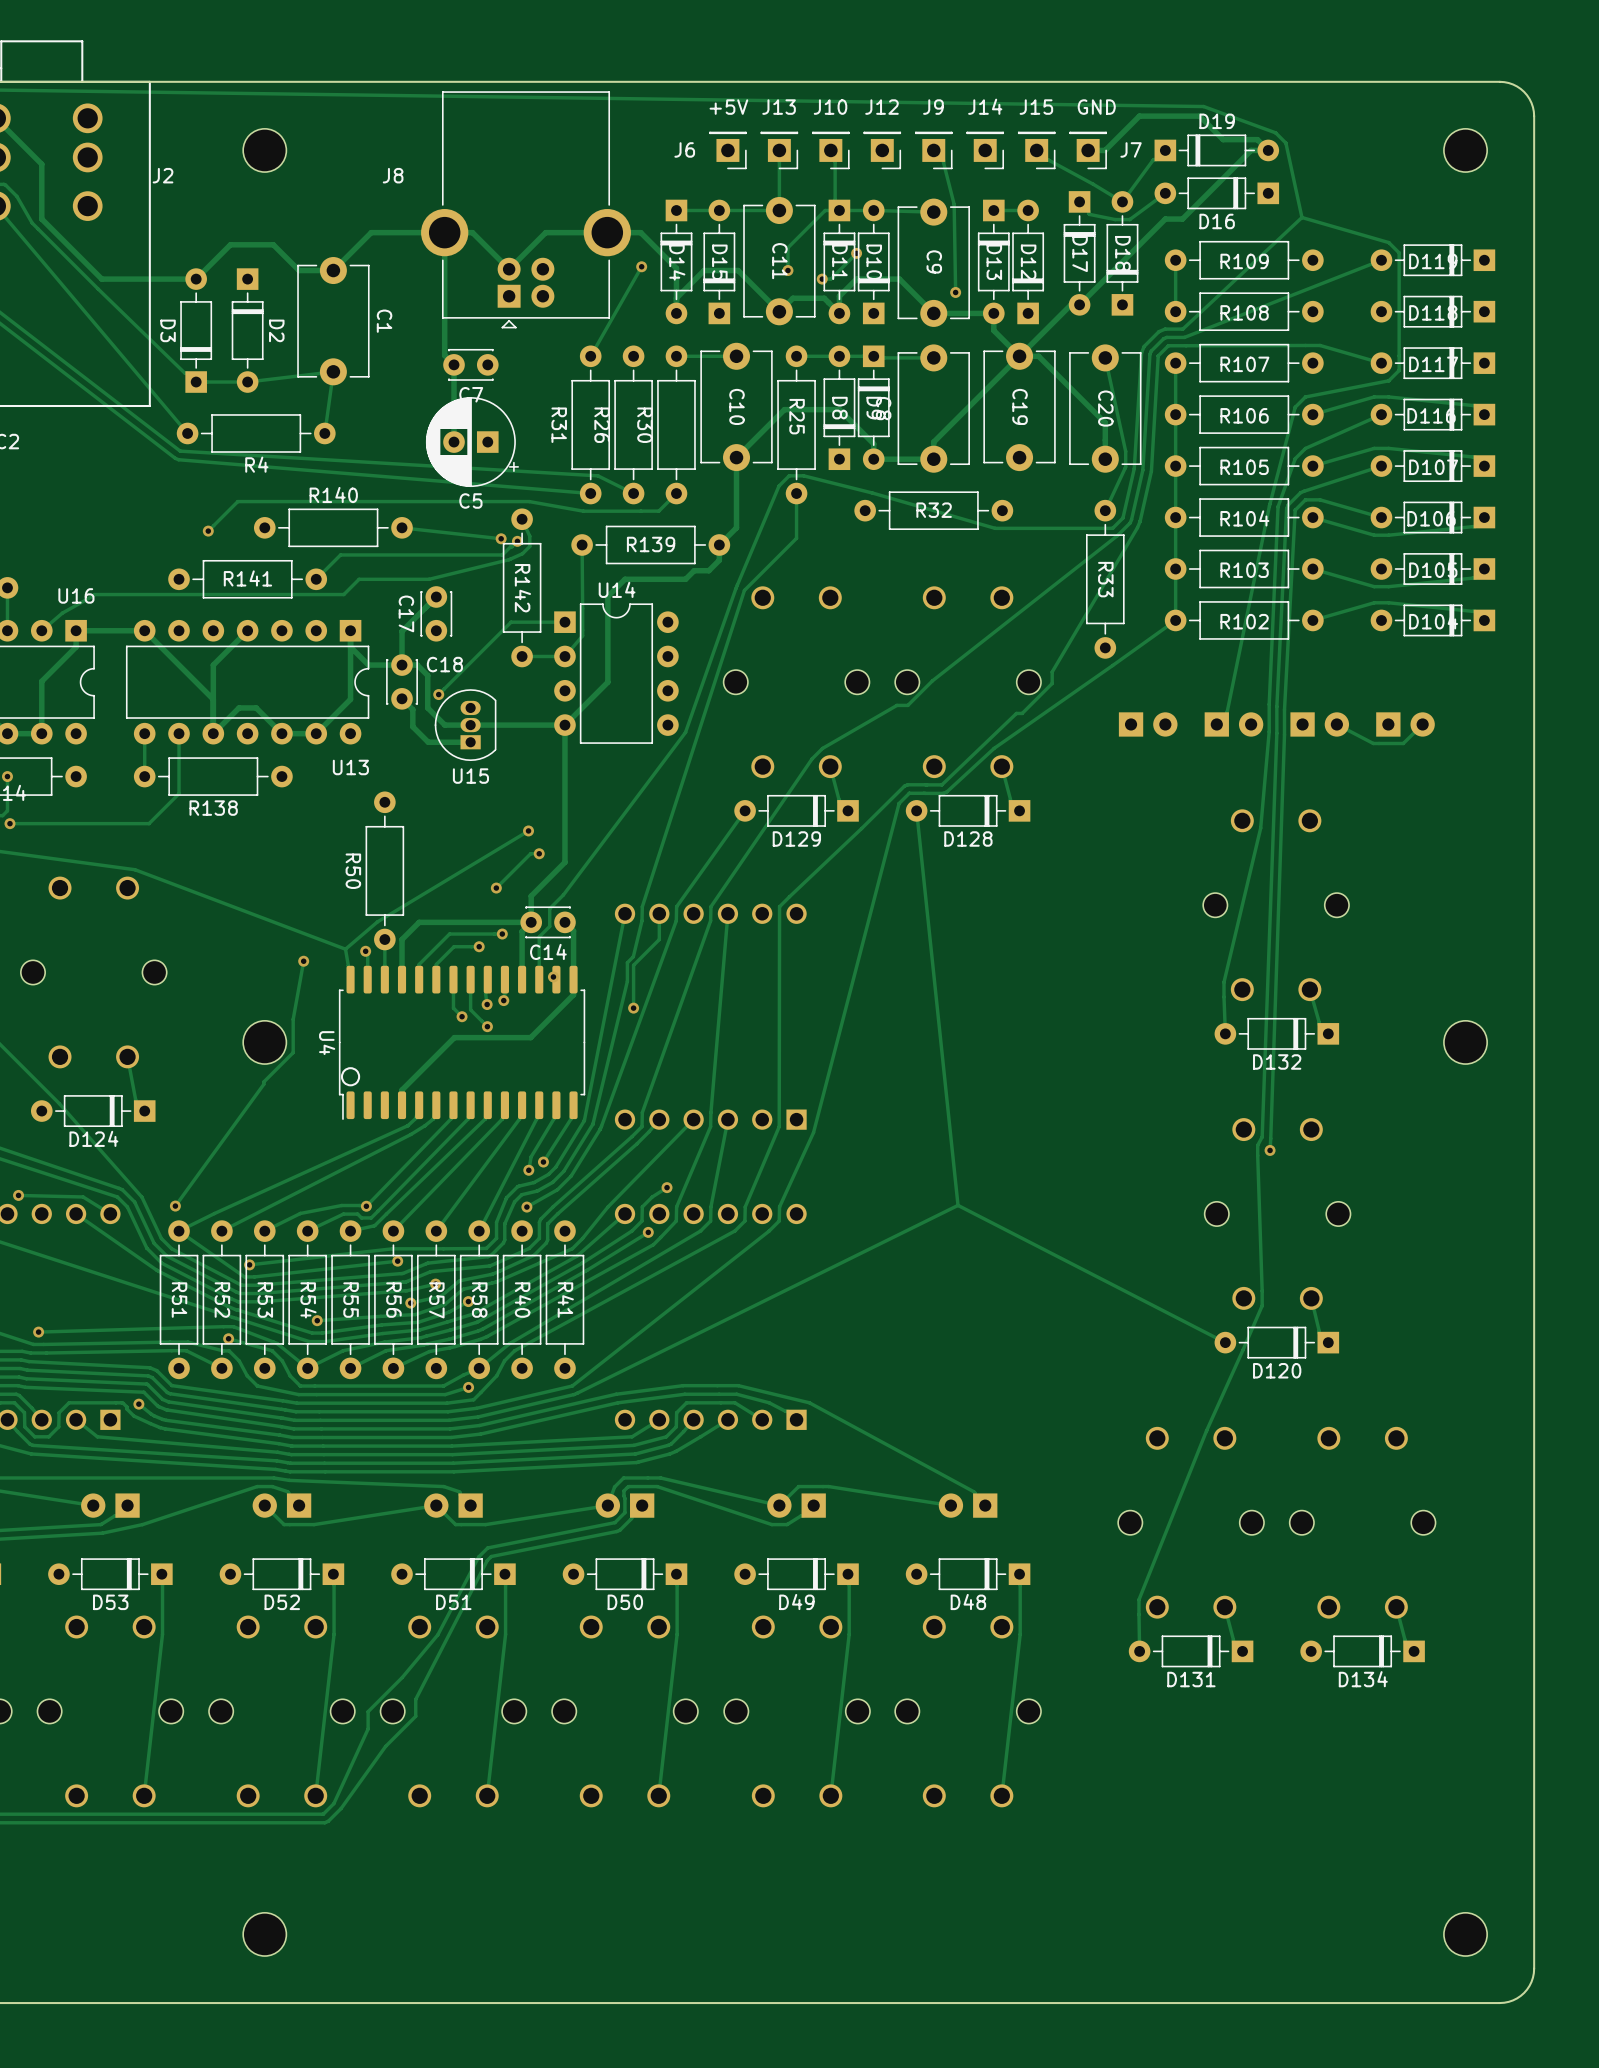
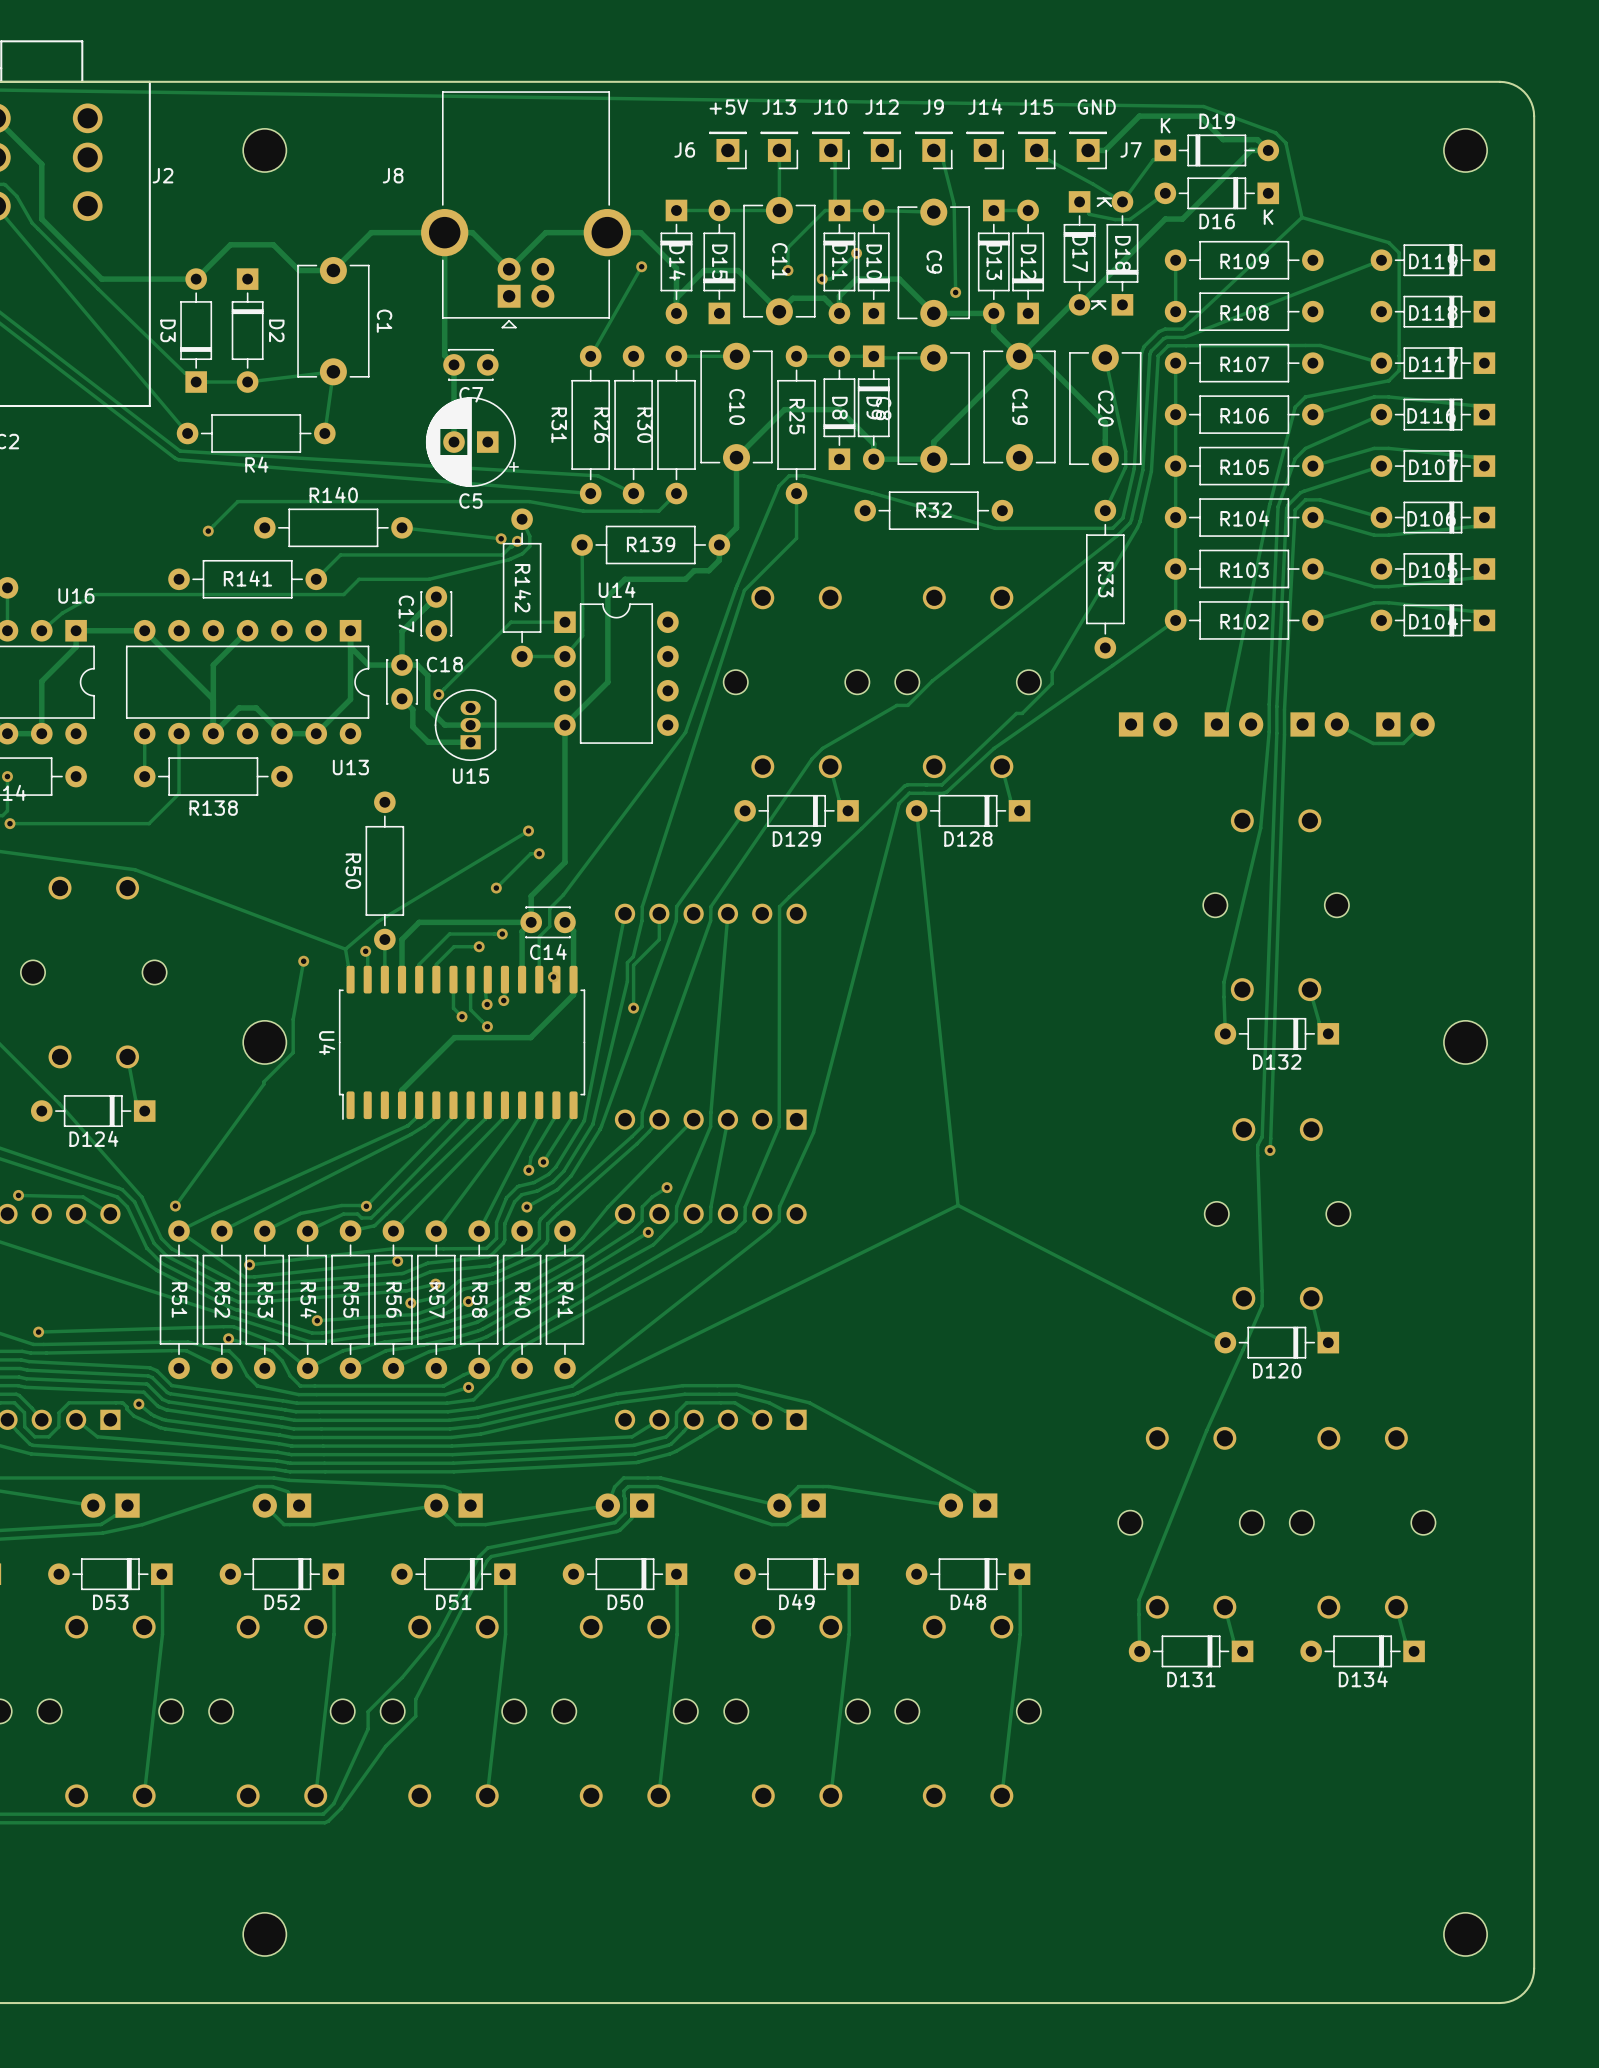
D19 text: none -> K (1165, 125)
D17 text: none -> K (1104, 202)
D16 text: none -> K (1268, 217)
D18 text: none -> K (1098, 305)
drawing: [340, 1067, 361, 1087] -> none

